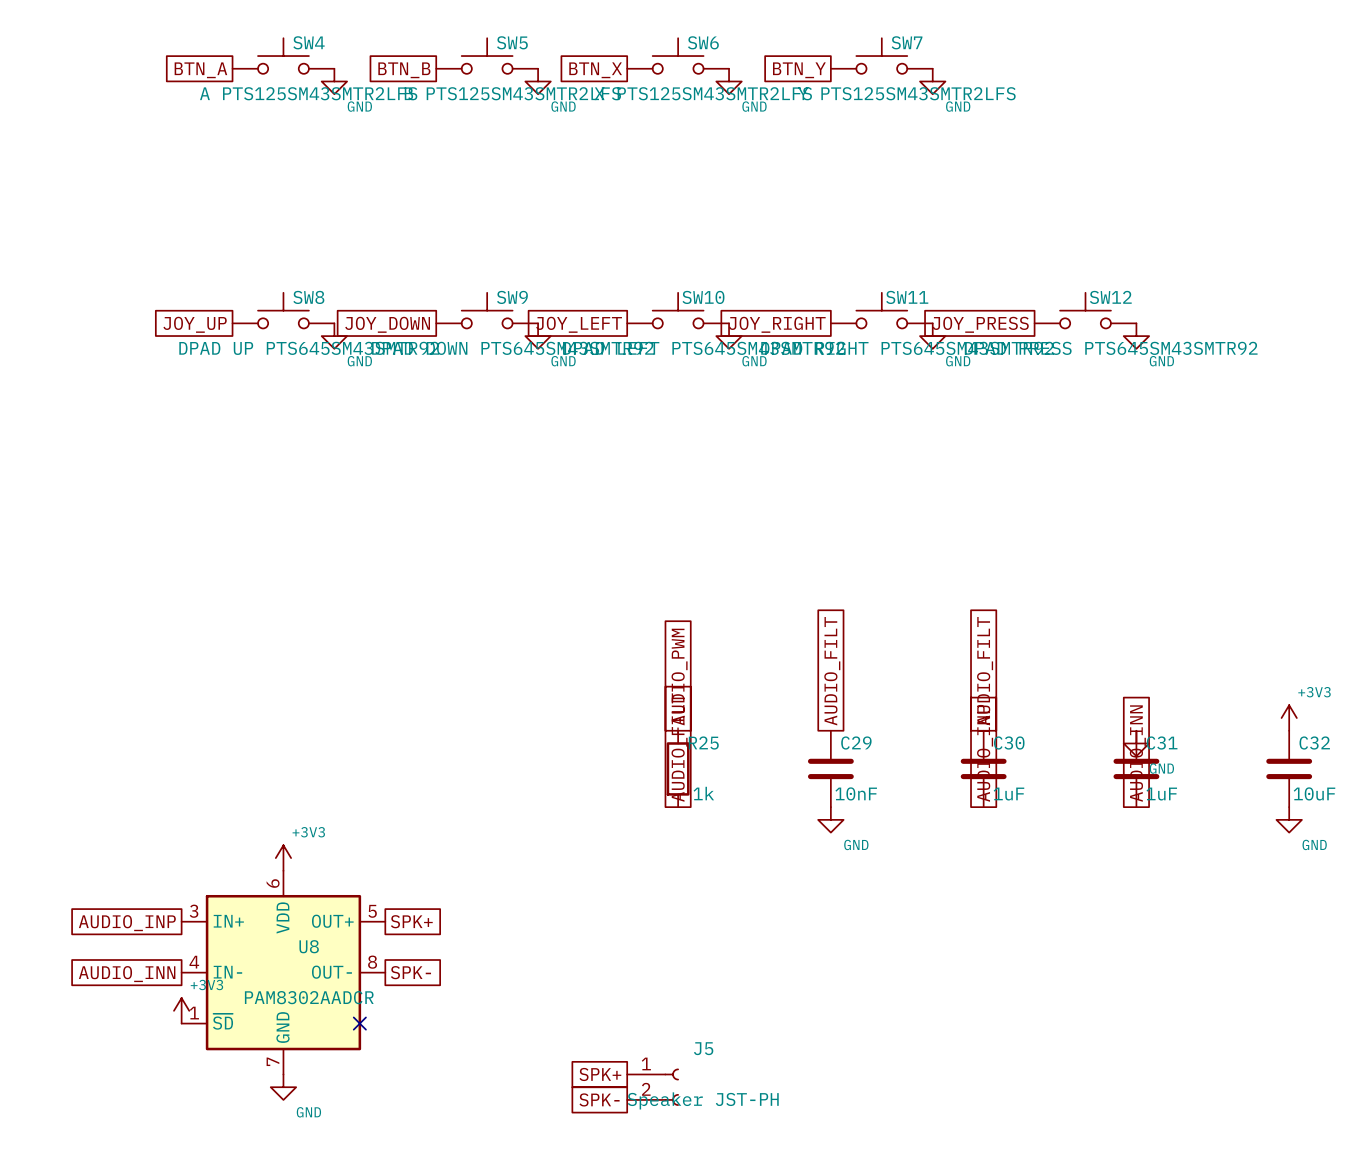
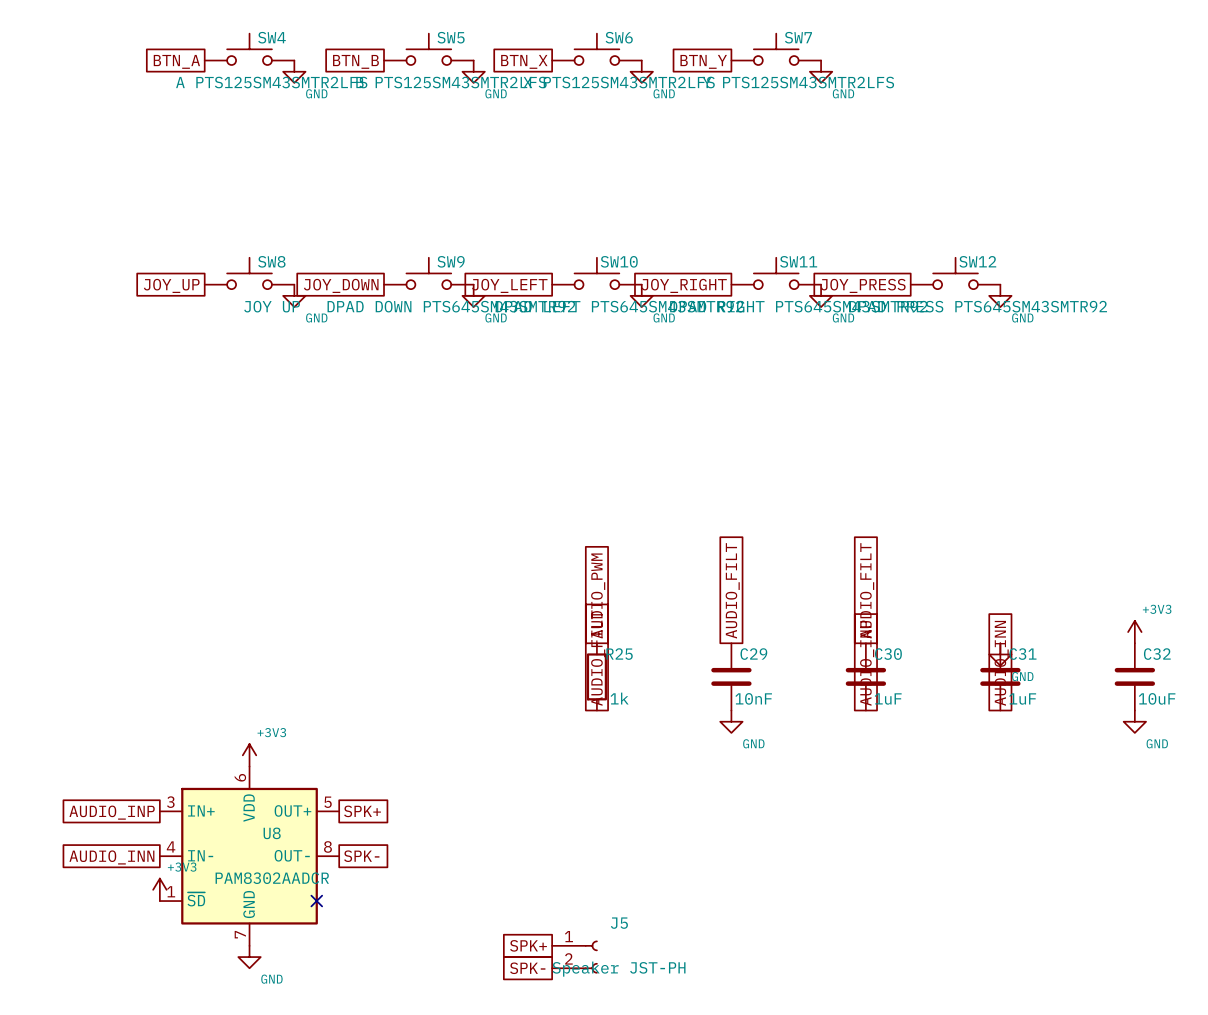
SW8 value: DPAD UP PTS645SM43SMTR92 (309, 348) -> JOY UP (272, 306)

